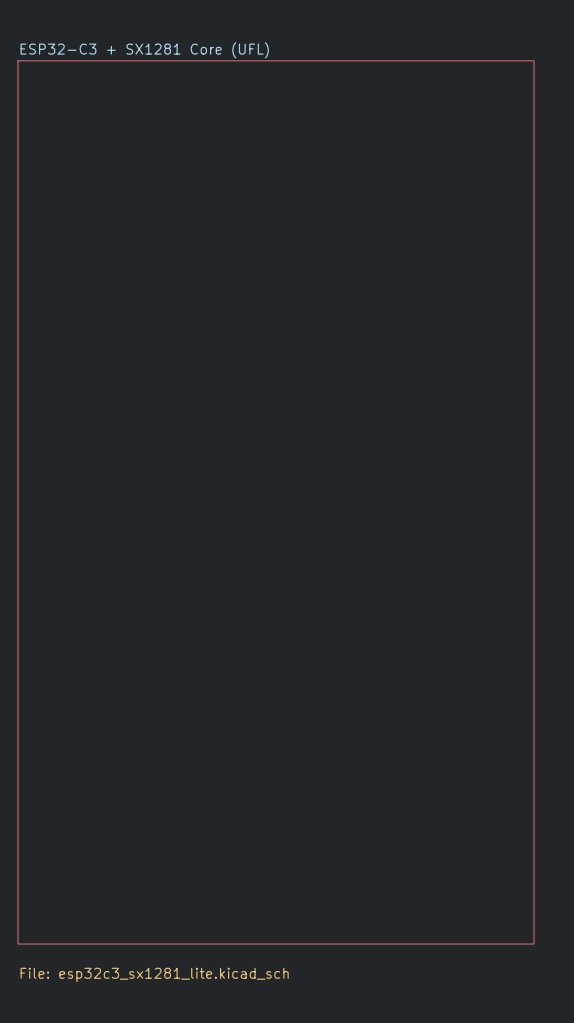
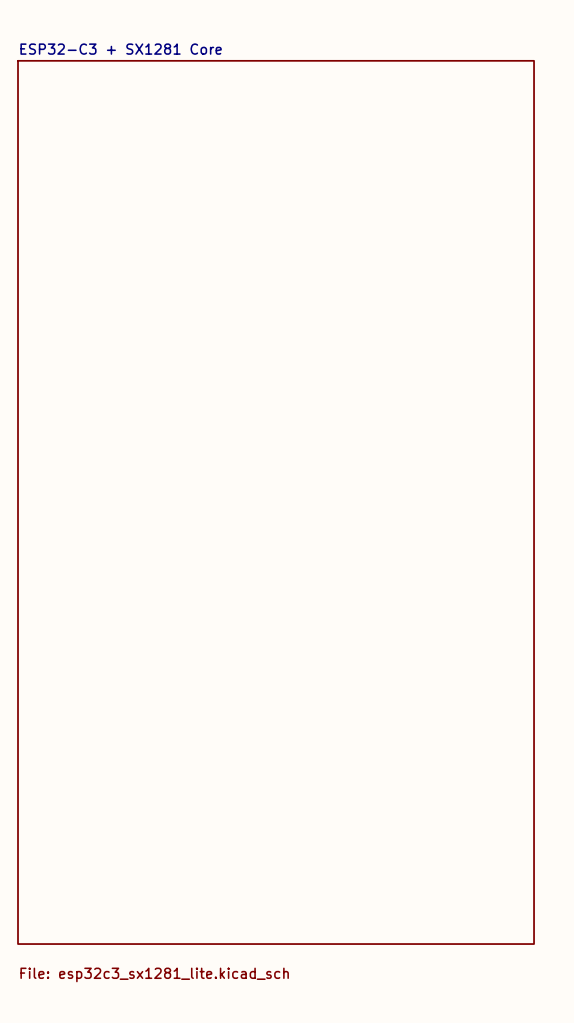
sheet ESP32-C3 + SX1281 Core (UFL) name: ESP32-C3 + SX1281 Core (UFL) (144, 50) -> ESP32-C3 + SX1281 Core (121, 49)

